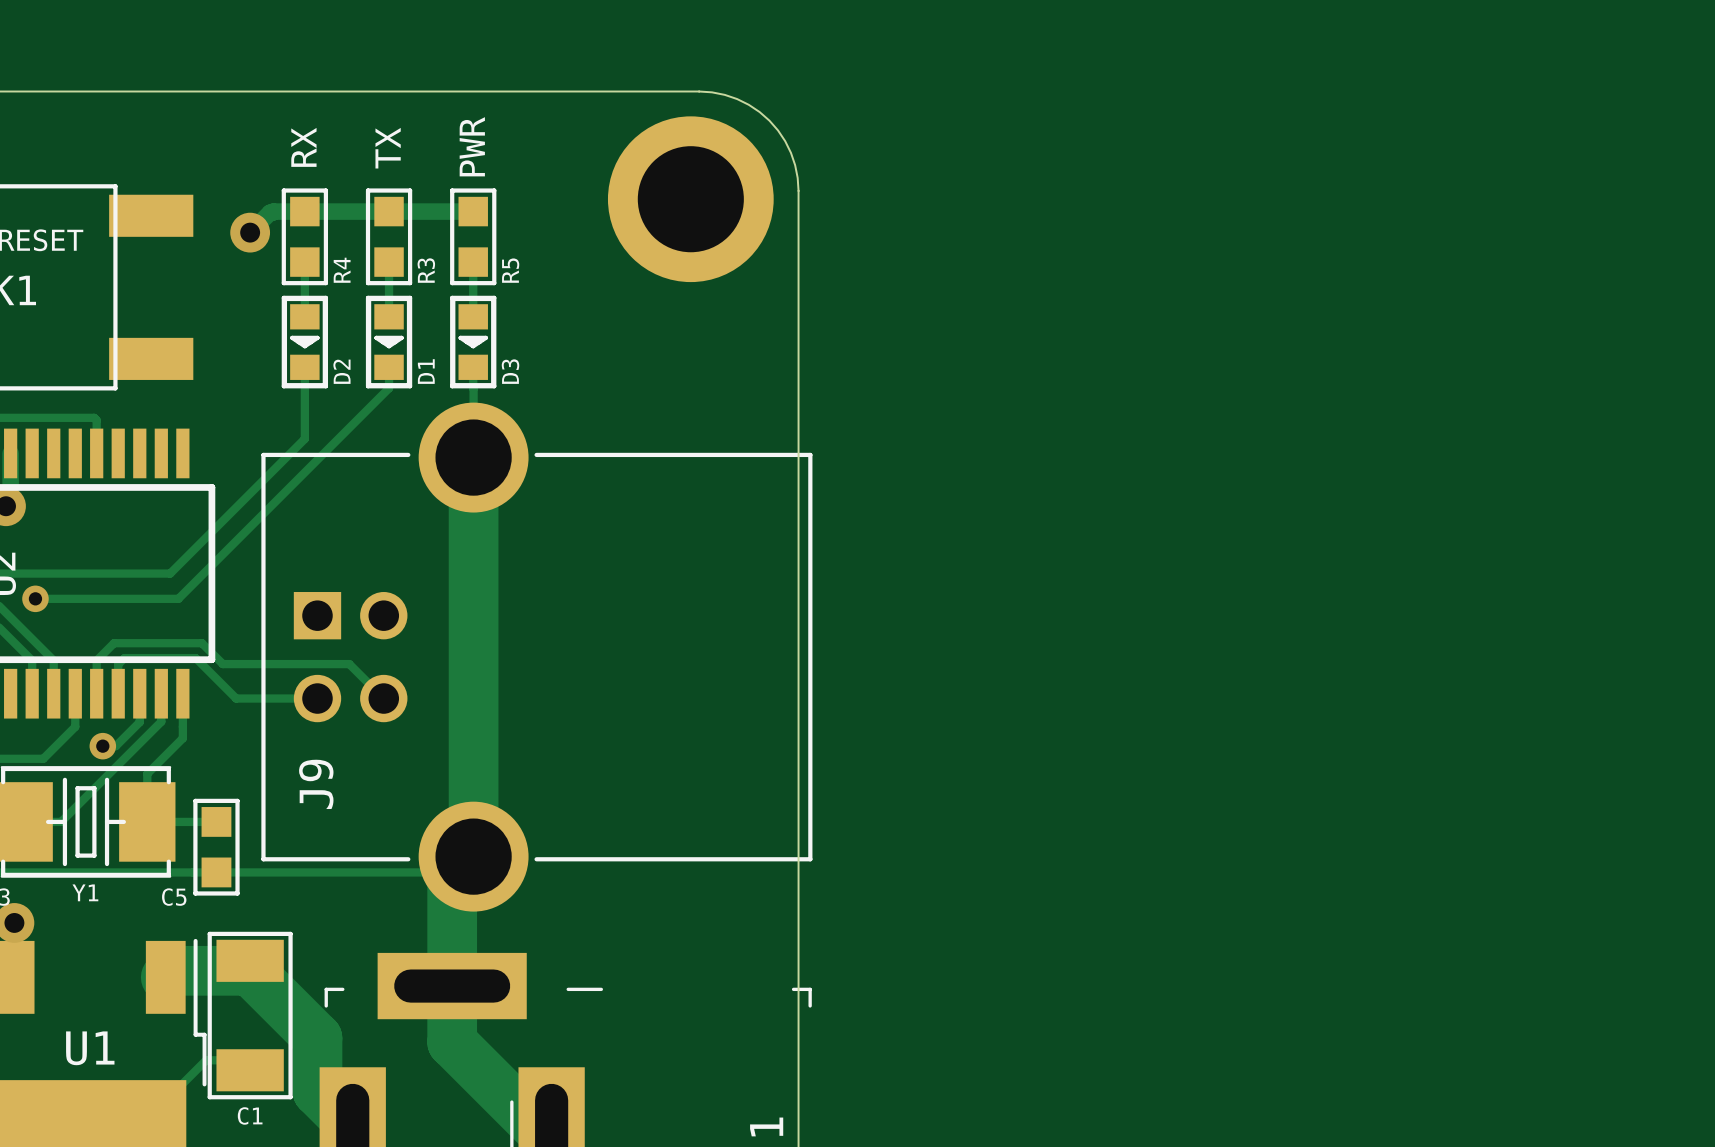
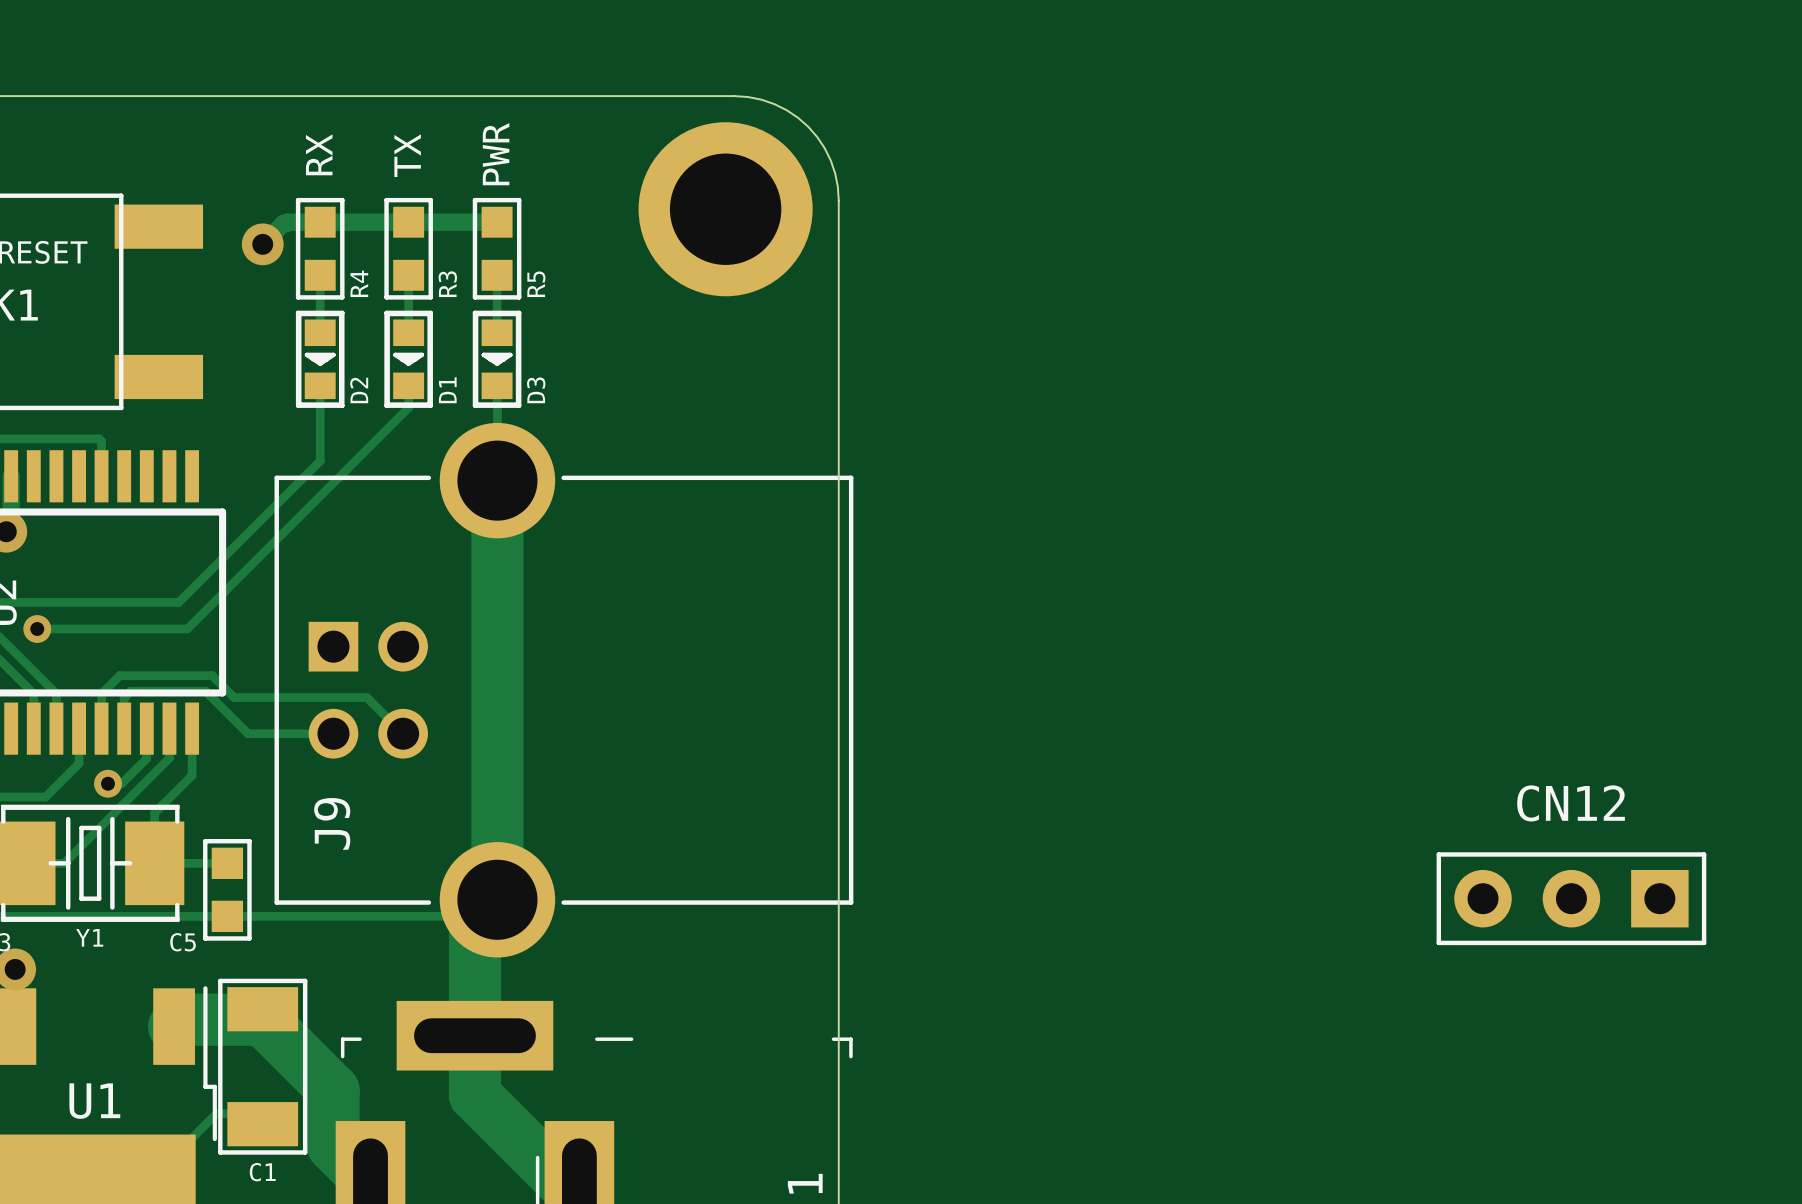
CN12: none -> (1571, 898)

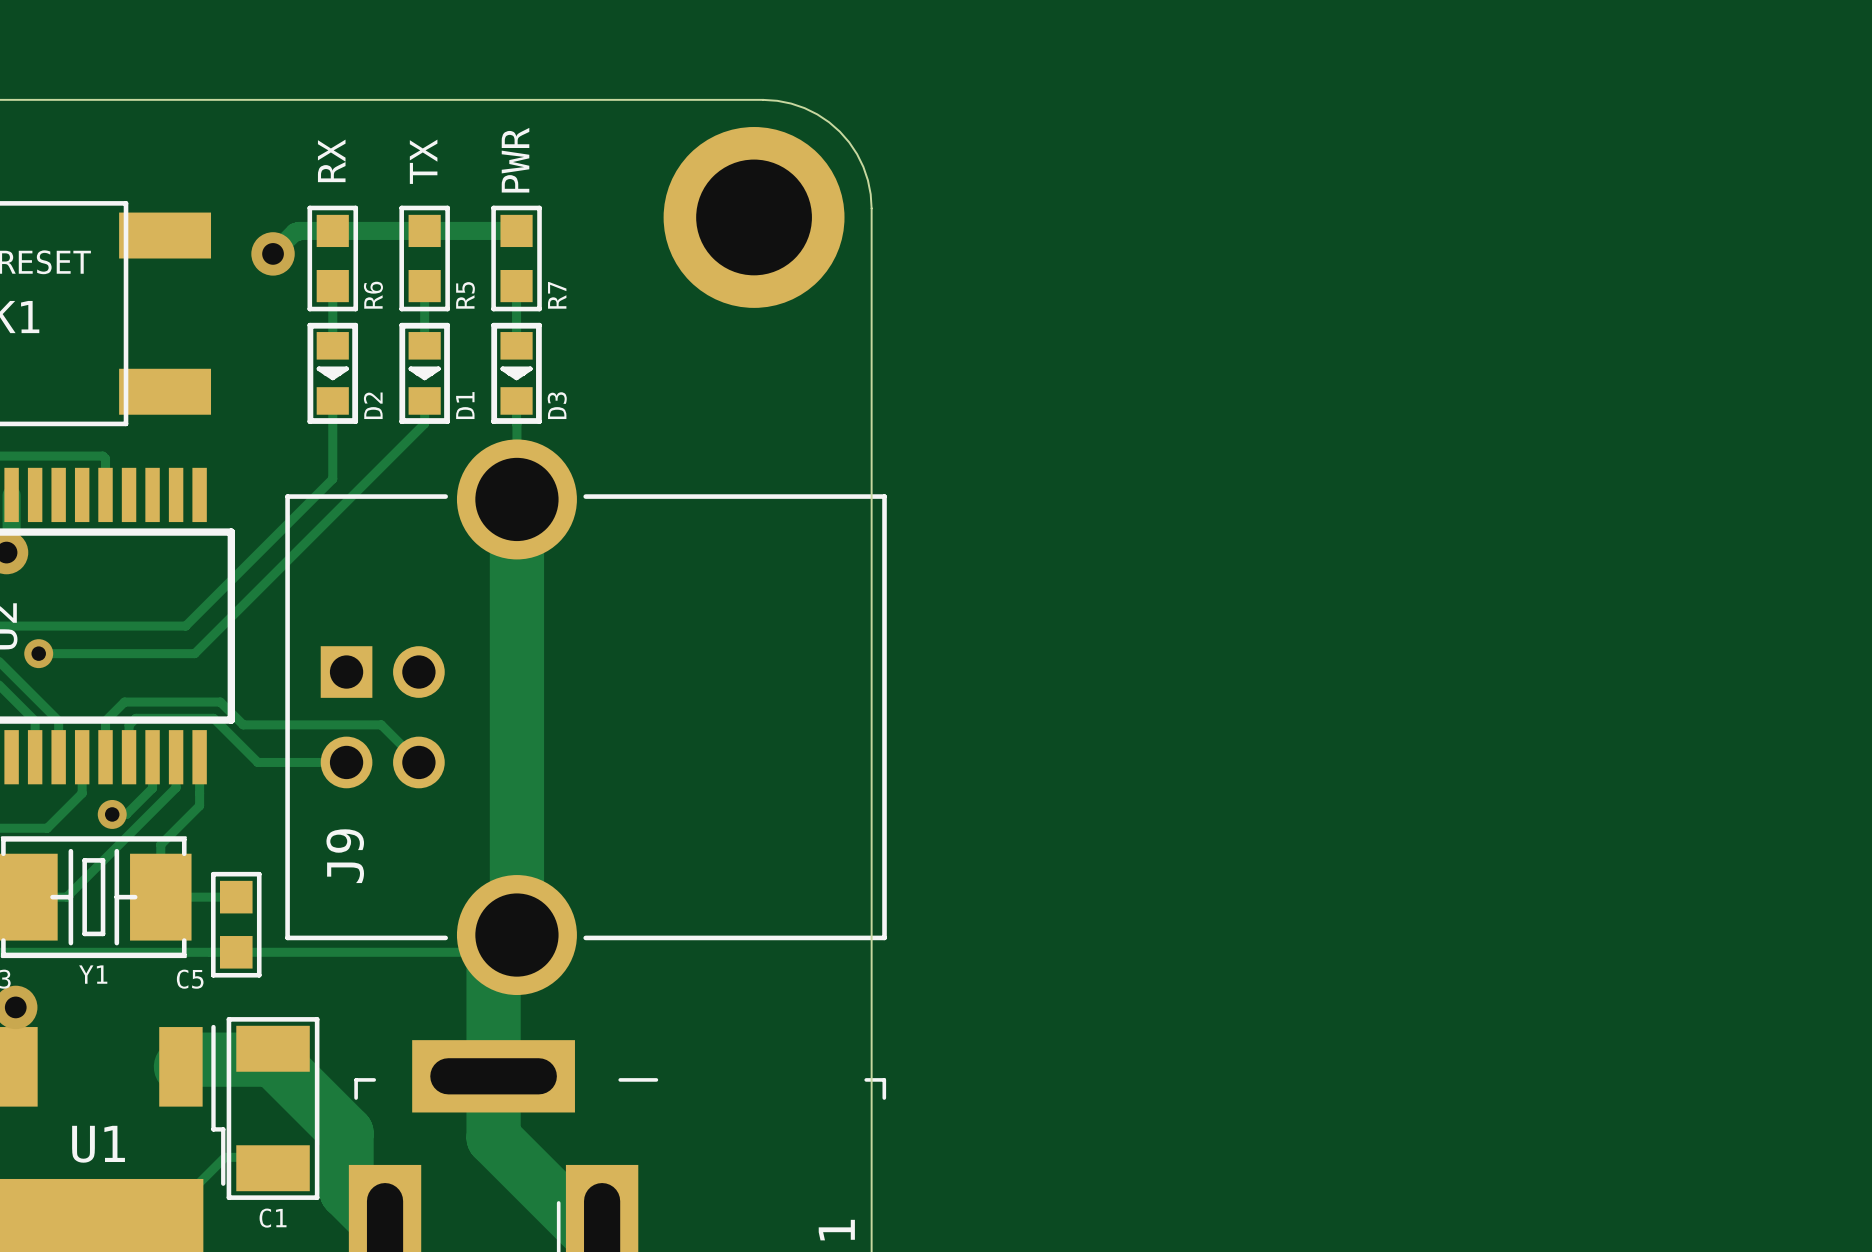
R4 name: R4 (359, 283) -> R6 (373, 295)
R3 name: R3 (447, 284) -> R5 (465, 295)
R5 name: R5 (536, 284) -> R7 (557, 295)
CN12: (1571, 898) -> none

